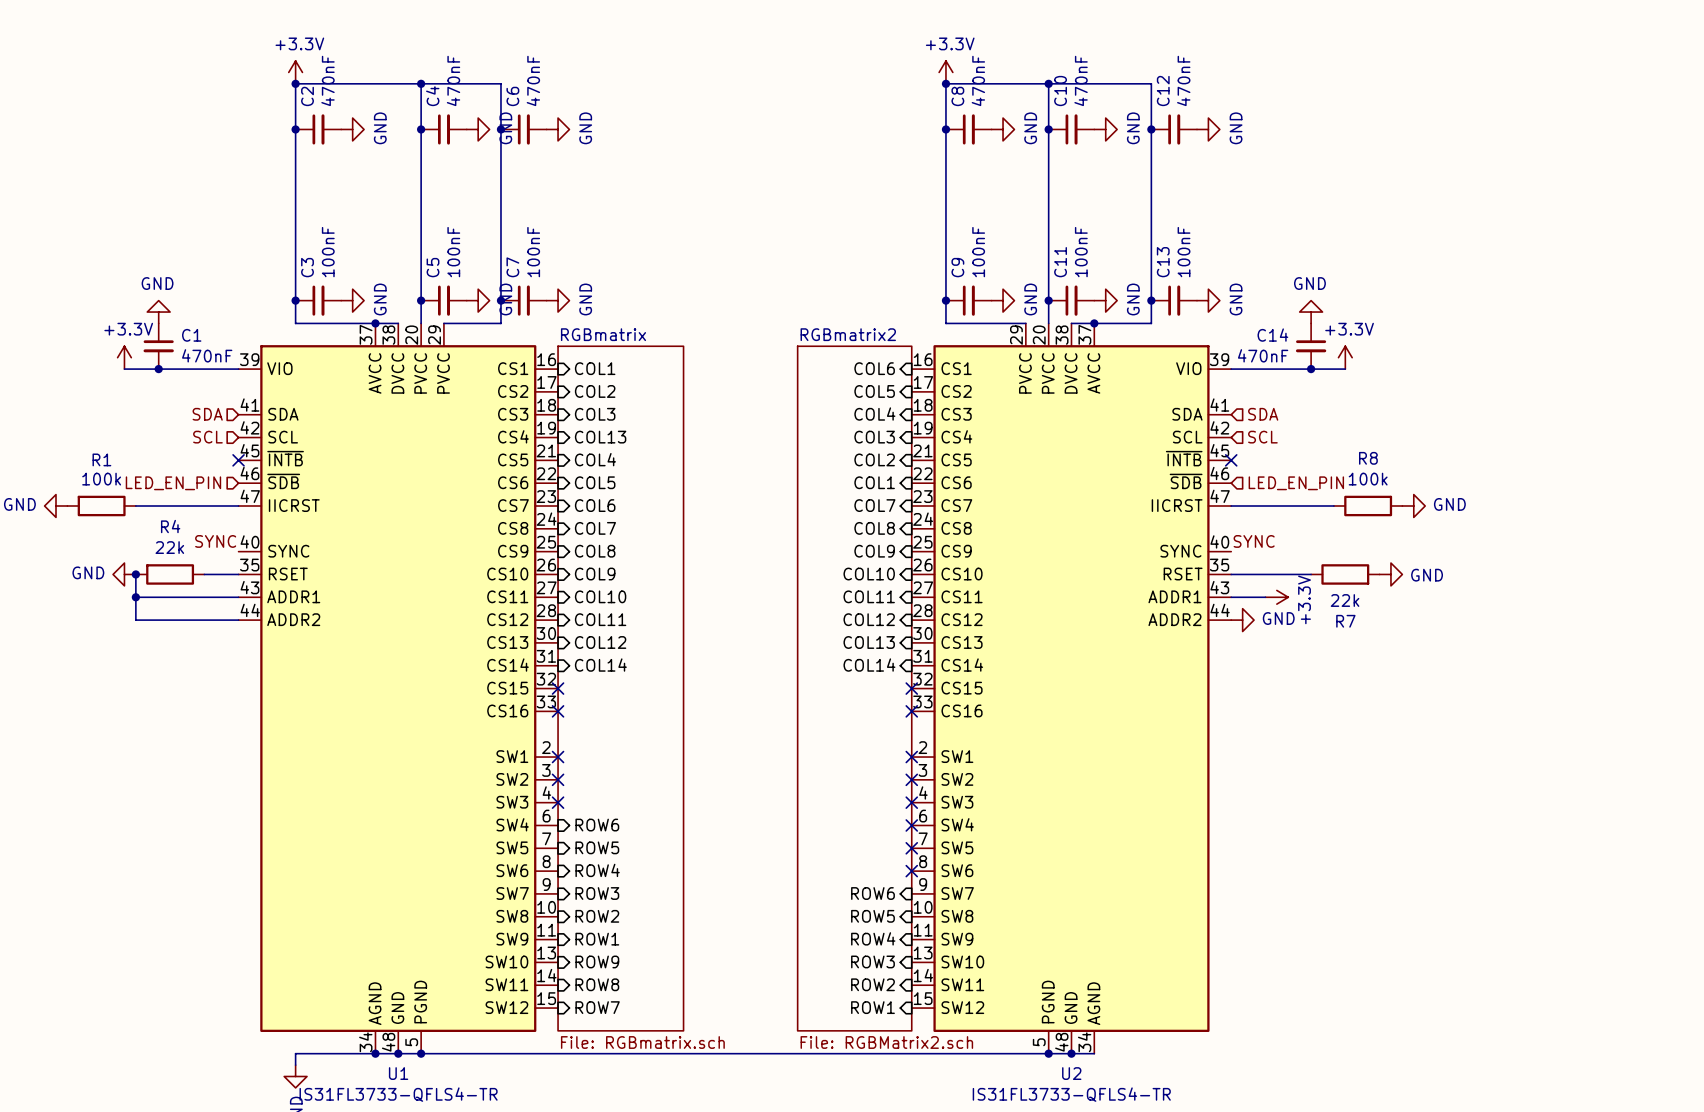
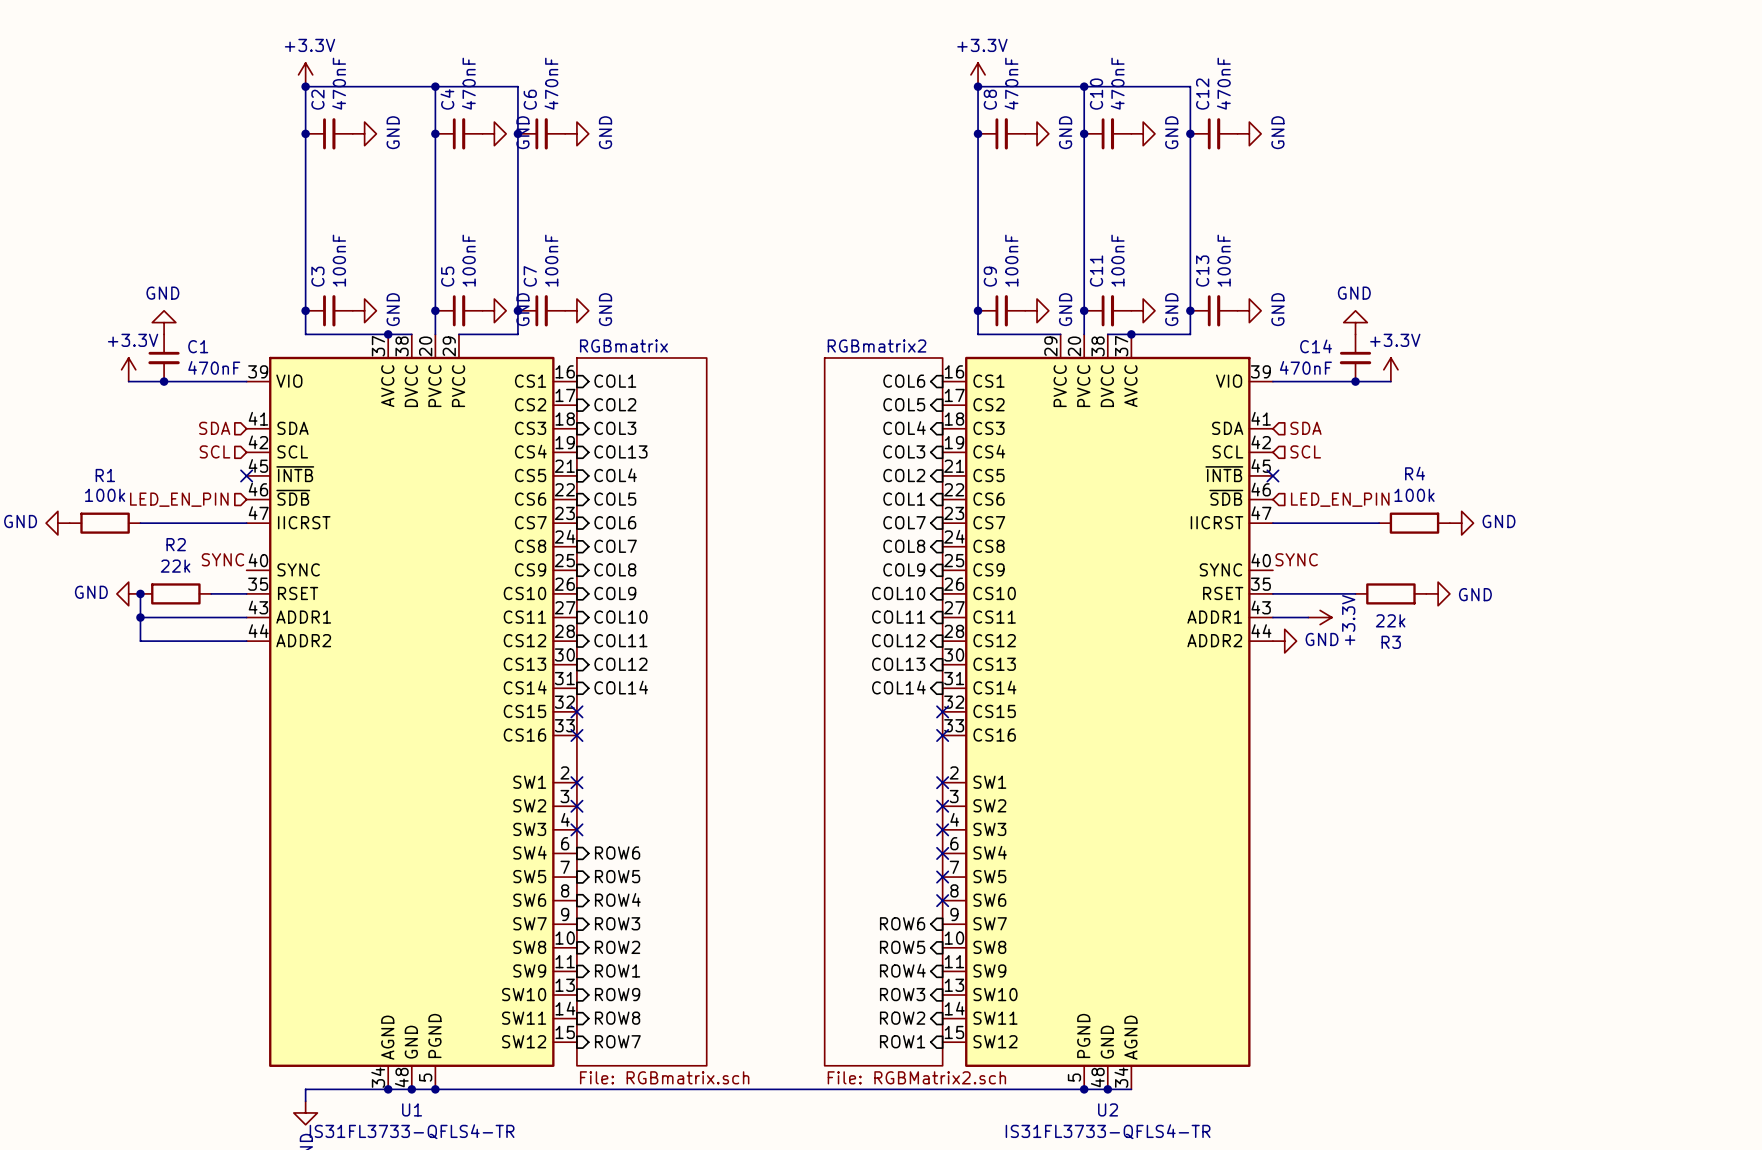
R8 name: R8 (1368, 458) -> R4 (1415, 473)
R4 name: R4 (170, 526) -> R2 (176, 544)
R7 name: R7 (1345, 621) -> R3 (1391, 642)

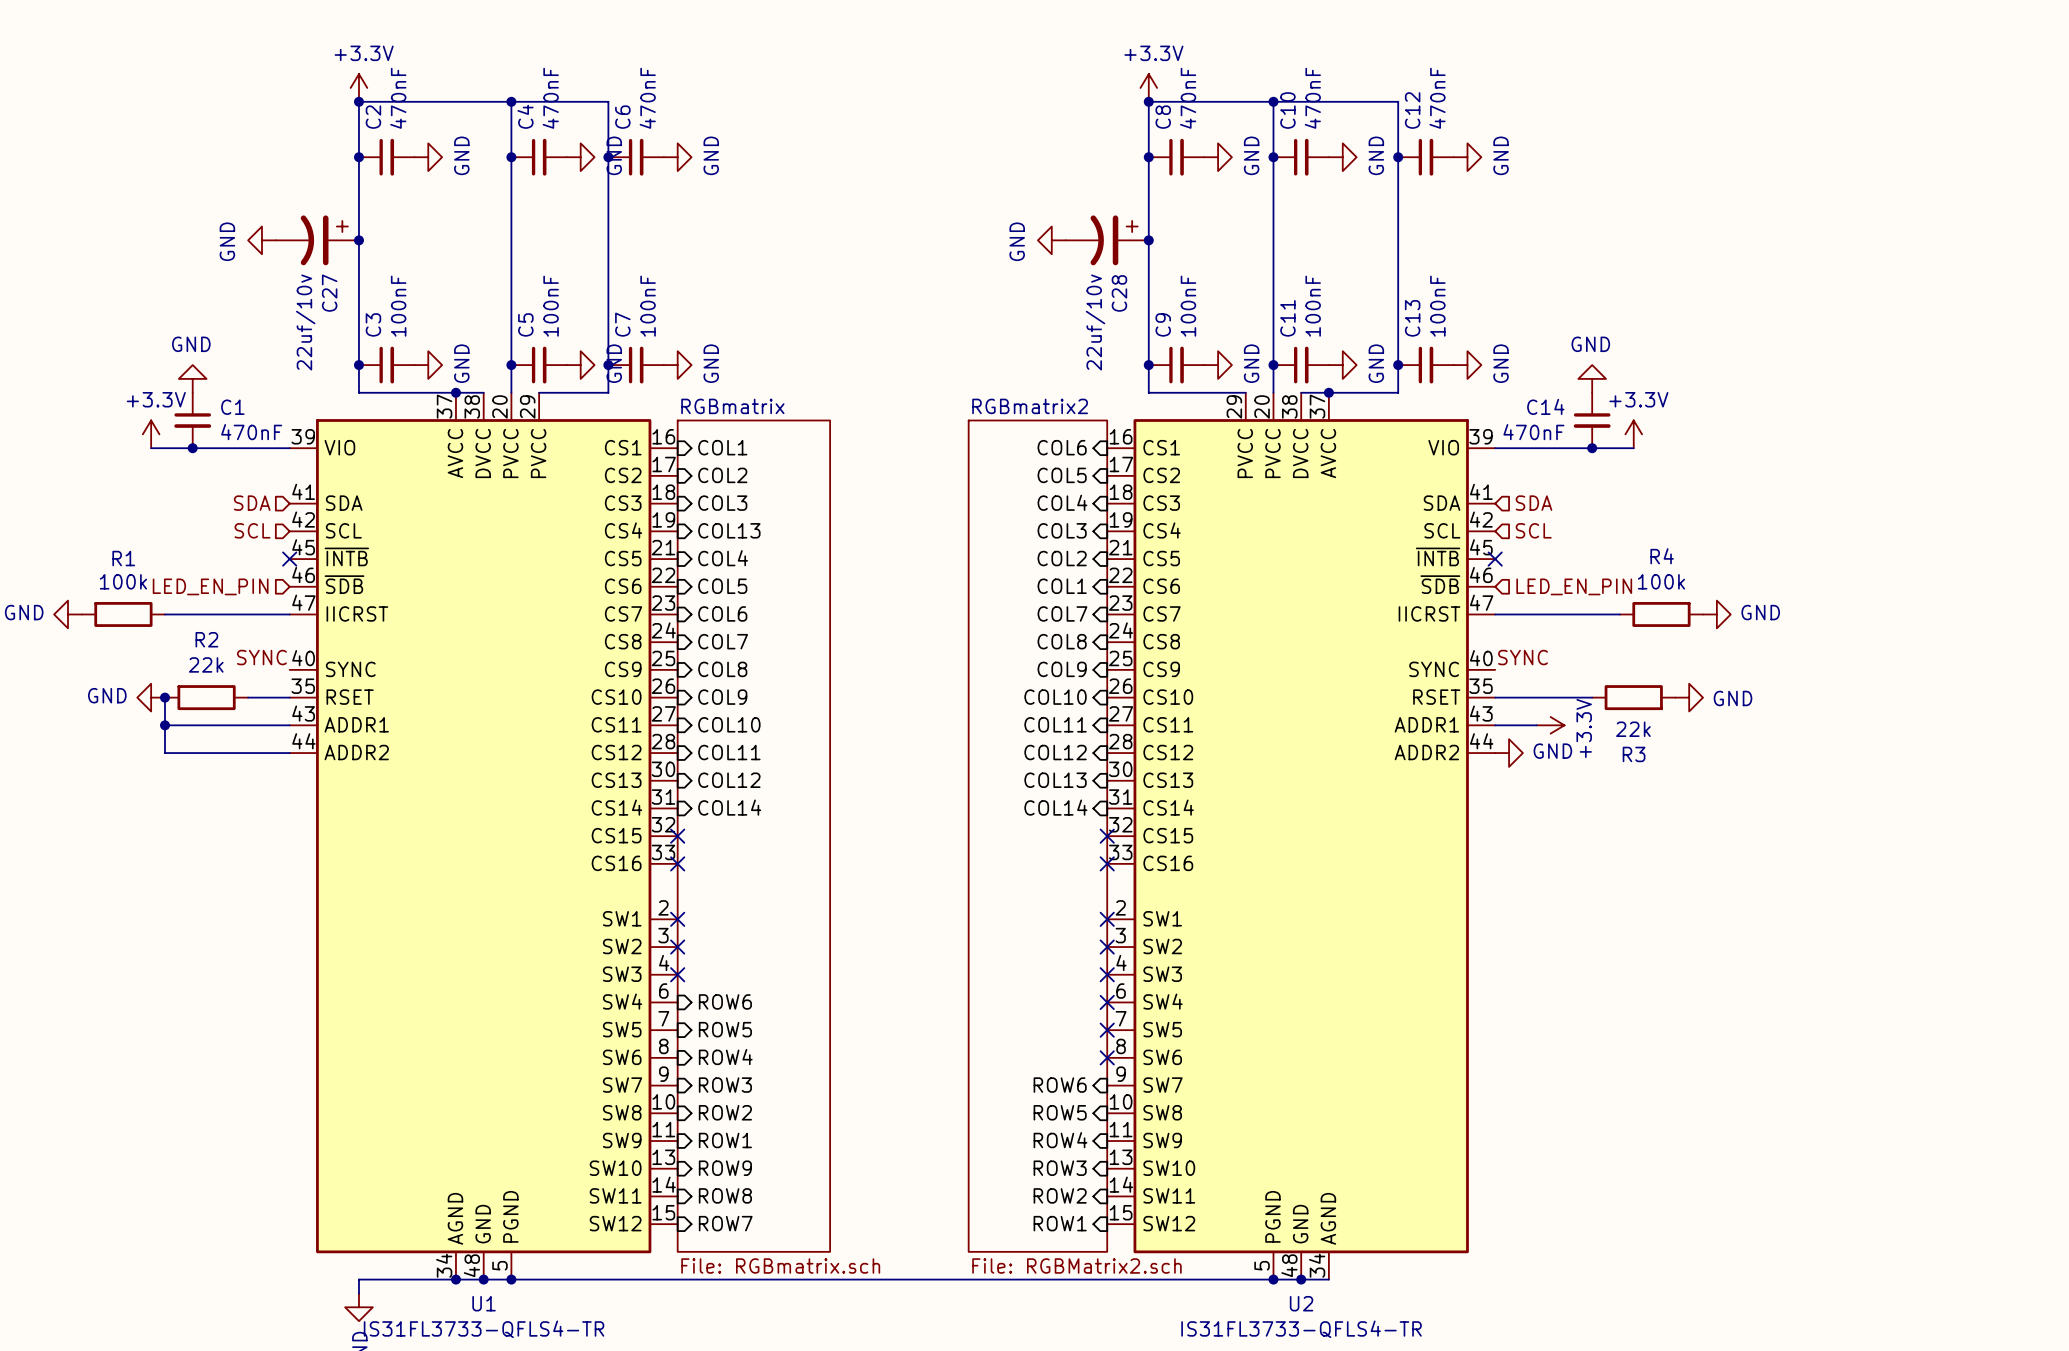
power symbol: none -> GND (261, 240)
C27: none -> 22uf/10v (317, 240)
junction: none -> (358, 240)
power symbol: none -> GND (1051, 240)
C28: none -> 22uf/10v (1107, 240)
junction: none -> (1148, 240)

